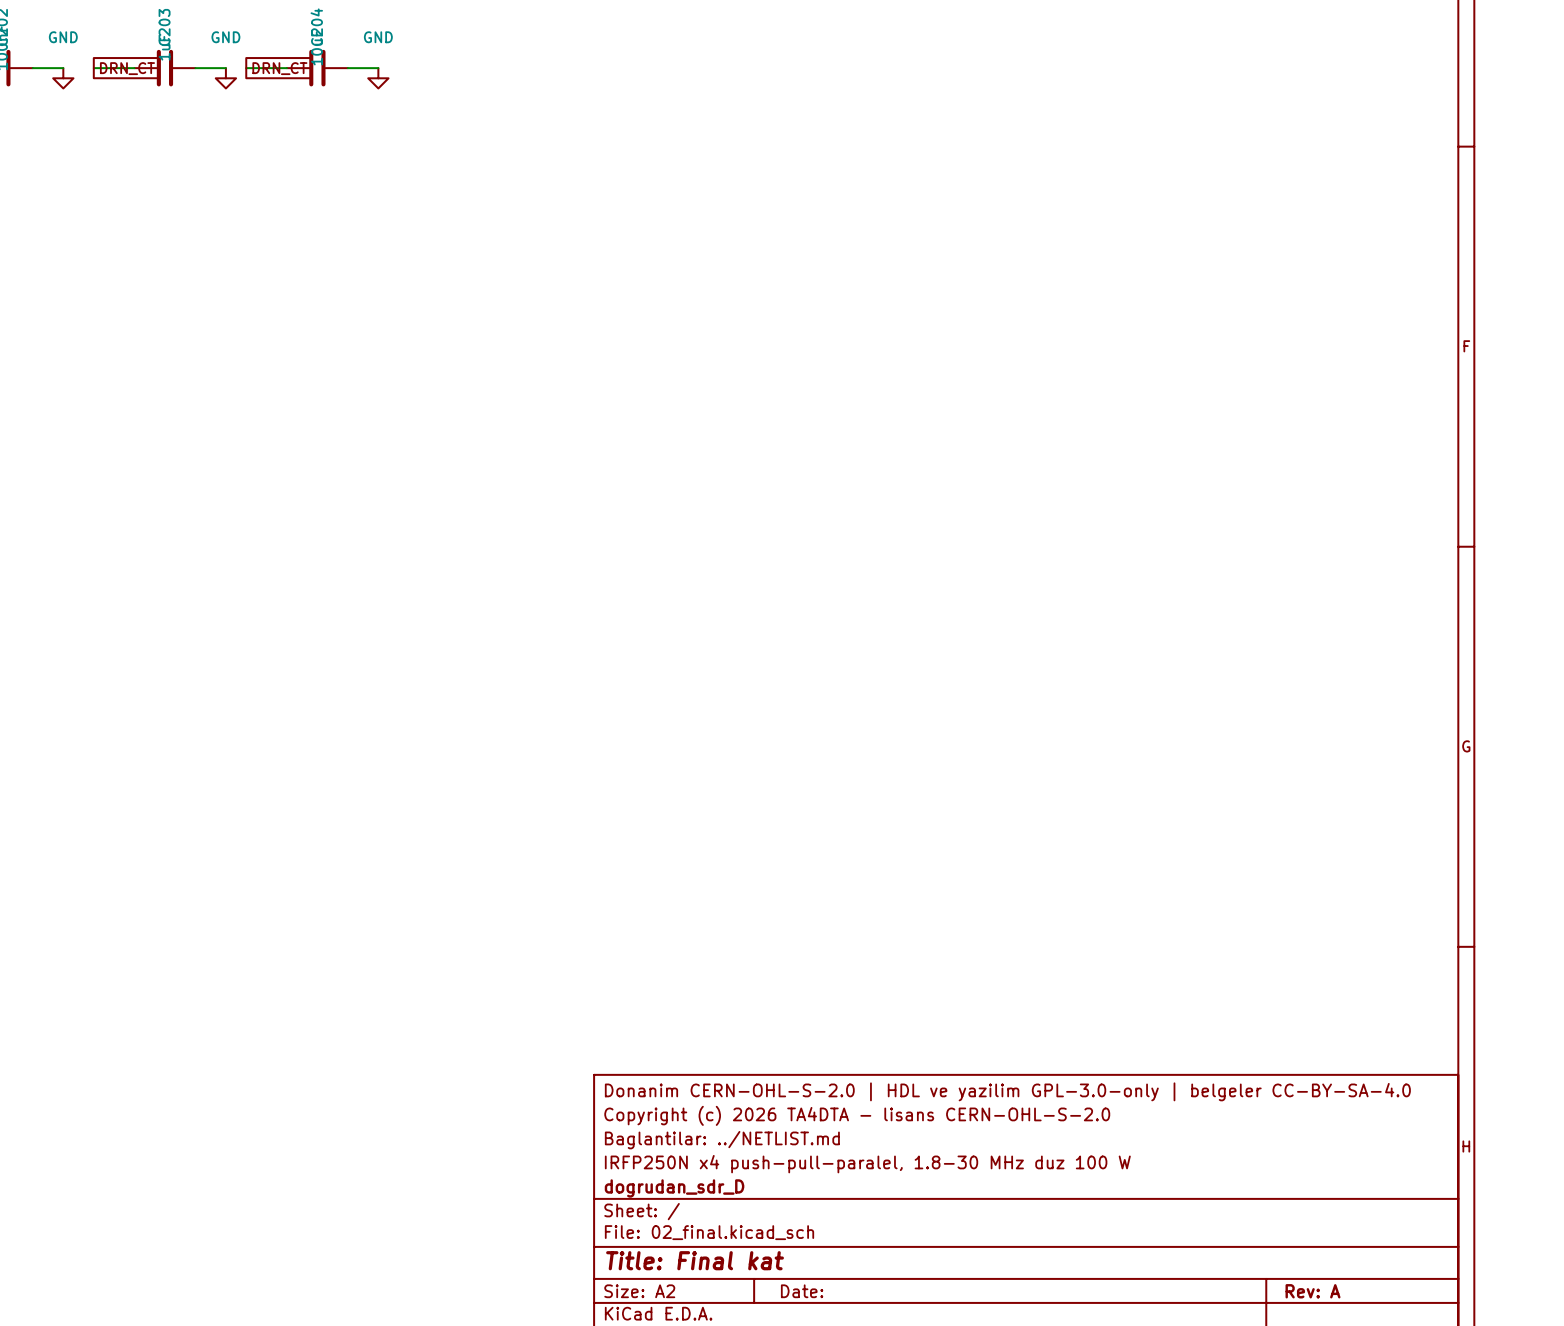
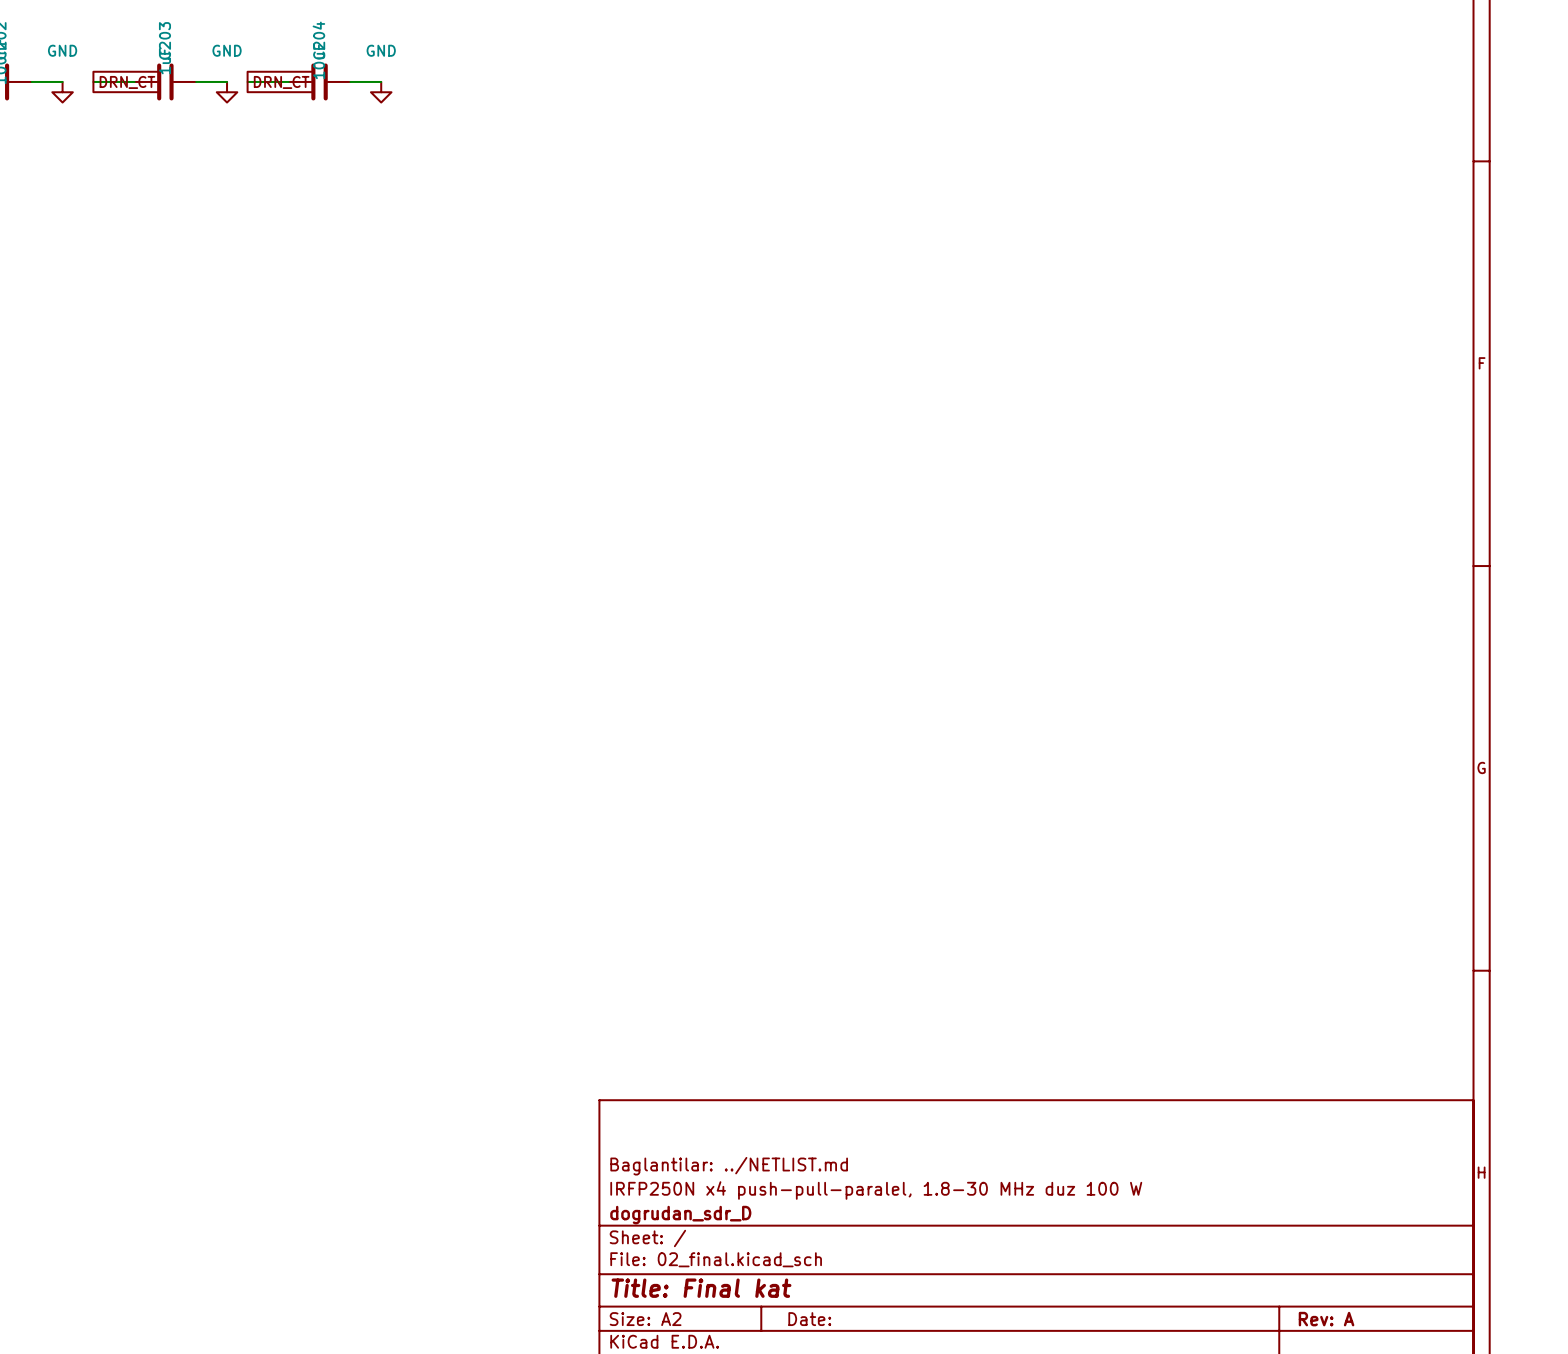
title block: Donanim CERN-OHL-S-2.0 | HDL ve yazilim GPL-3.0-only | belgeler CC-BY-SA-4.0 (1007, 1091) -> none
title block: Copyright (c) 2026 TA4DTA - lisans CERN-OHL-S-2.0 (857, 1115) -> none

